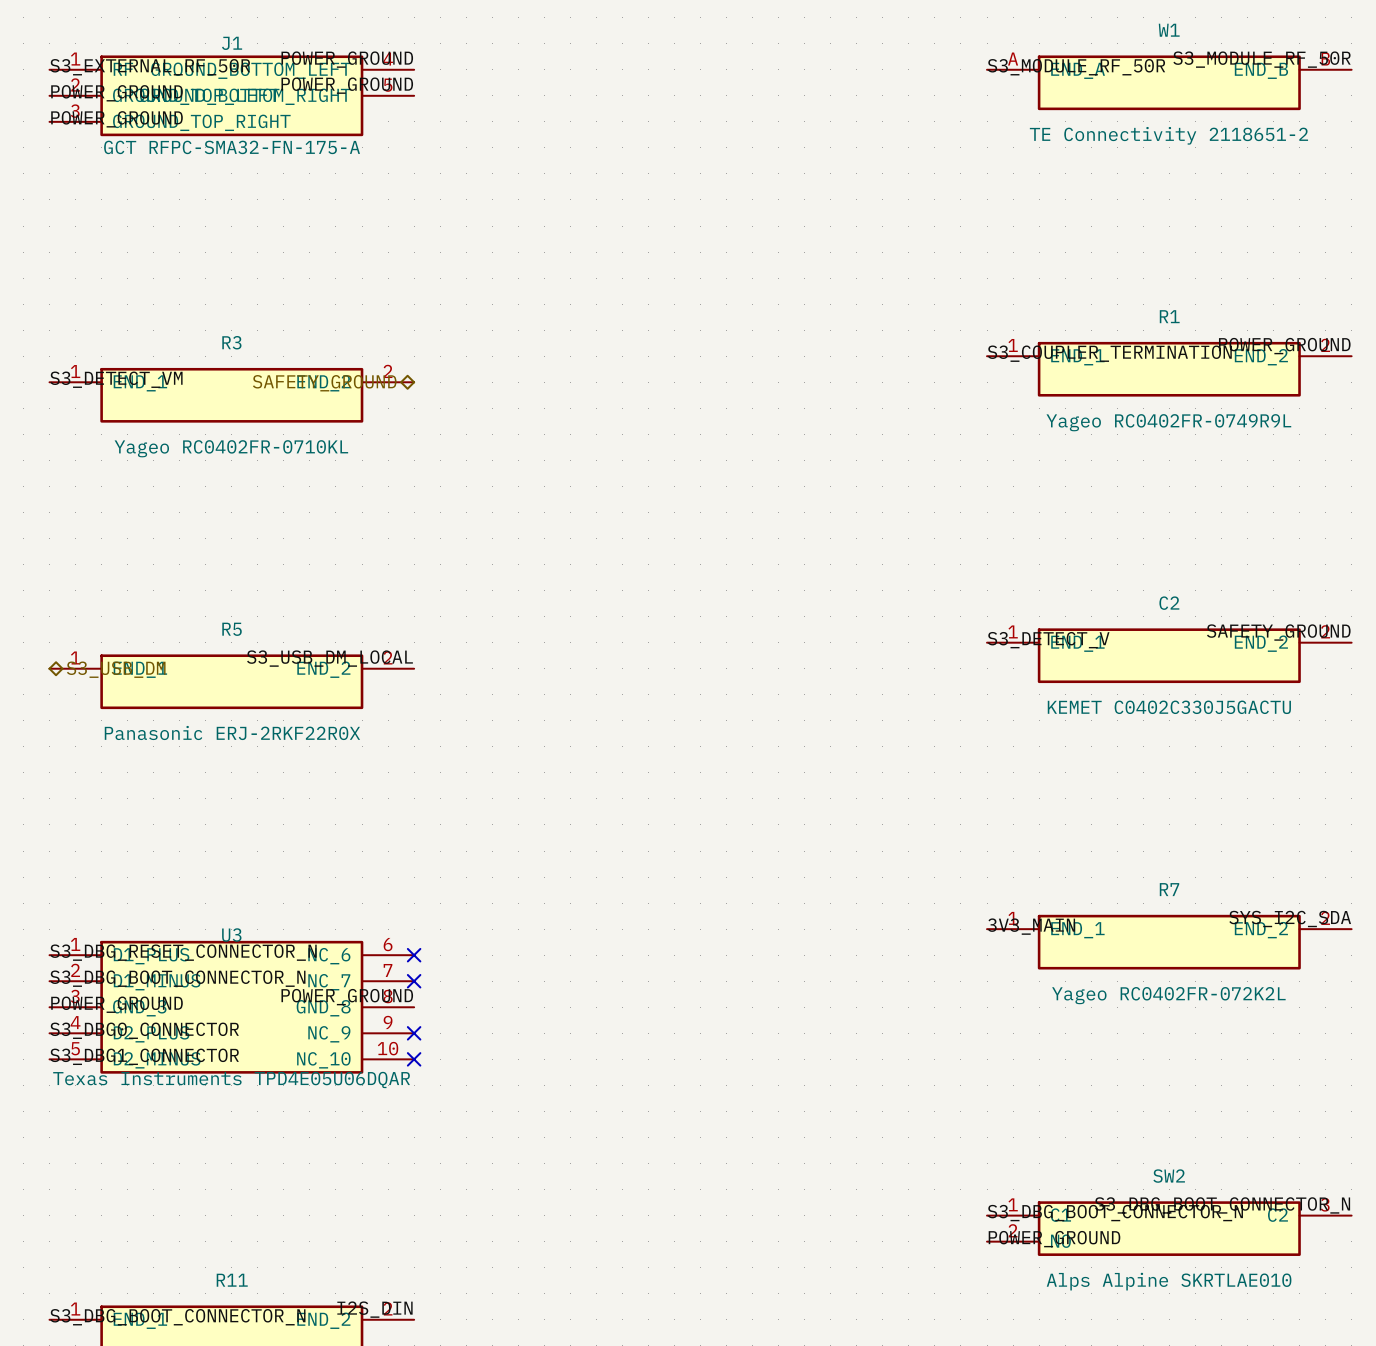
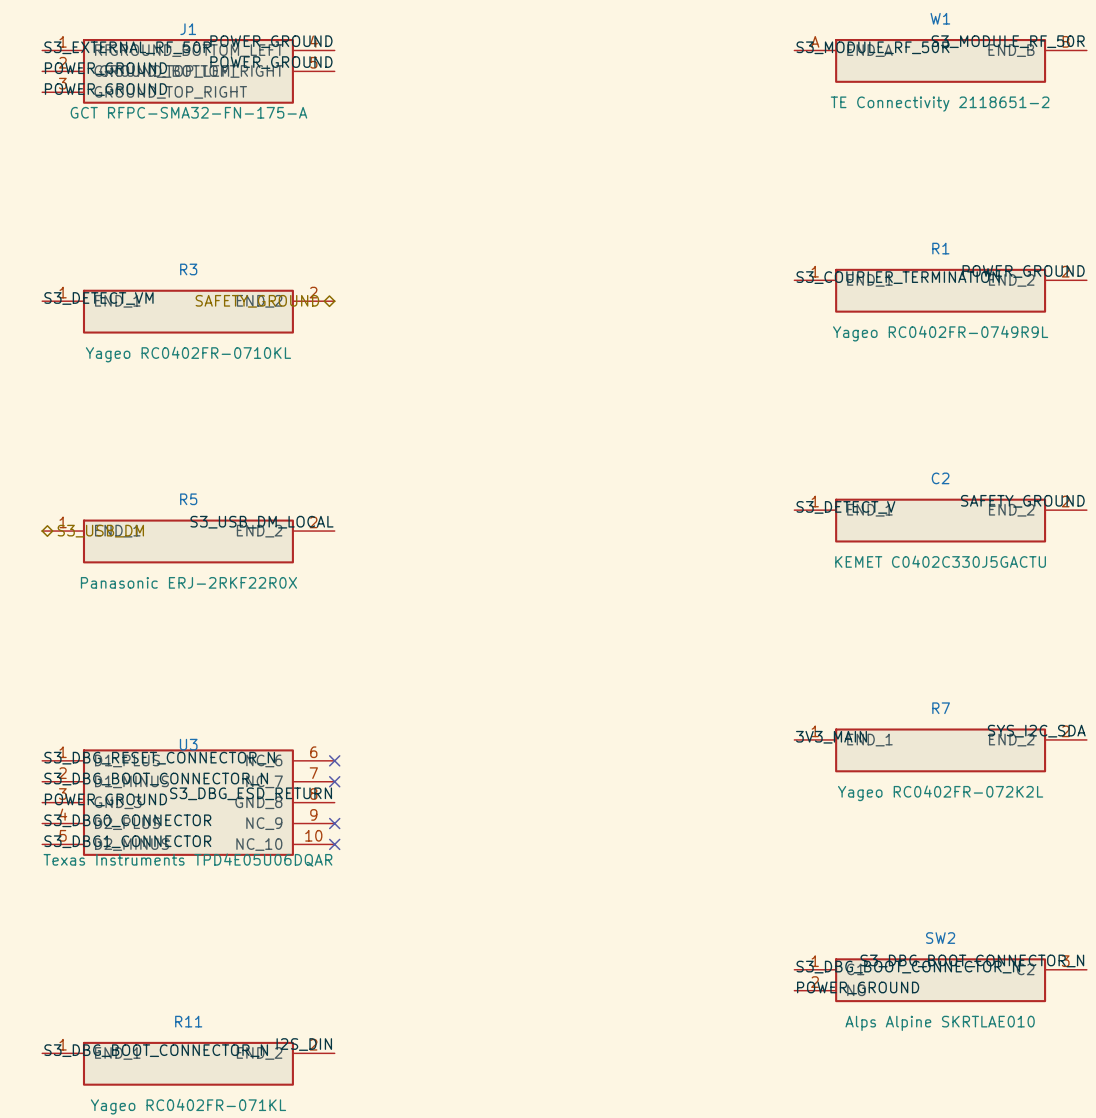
label: POWER_GROUND (347, 997) -> S3_DBG_ESD_RETURN (251, 793)

